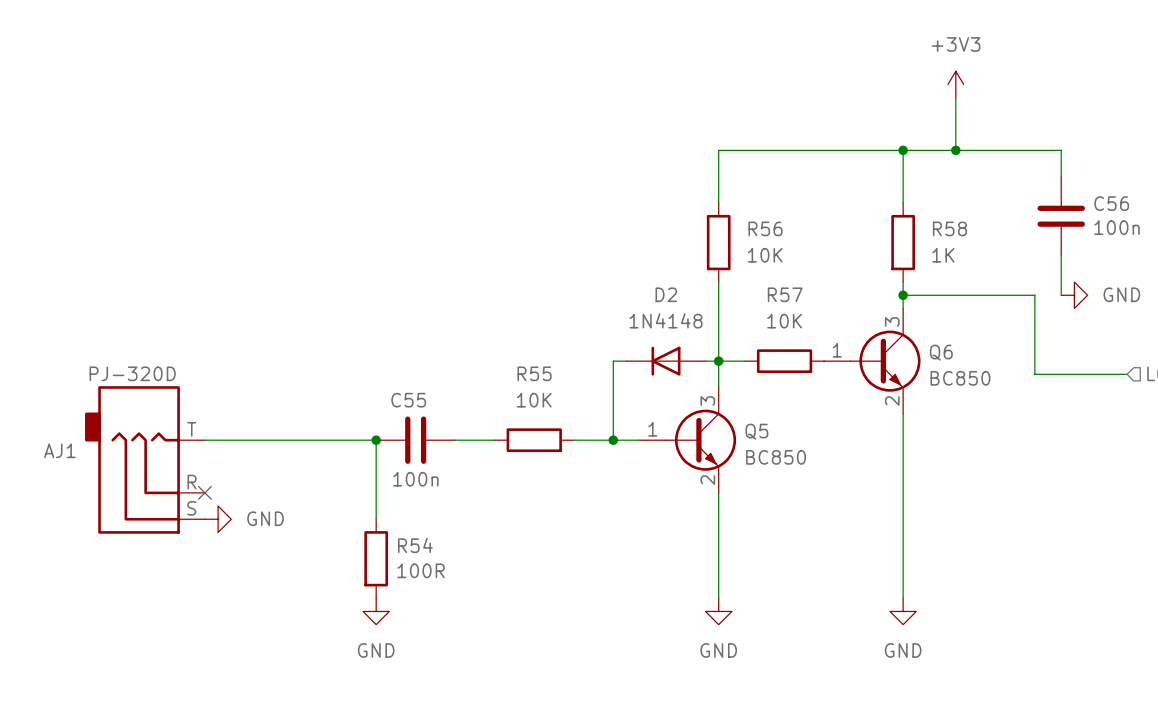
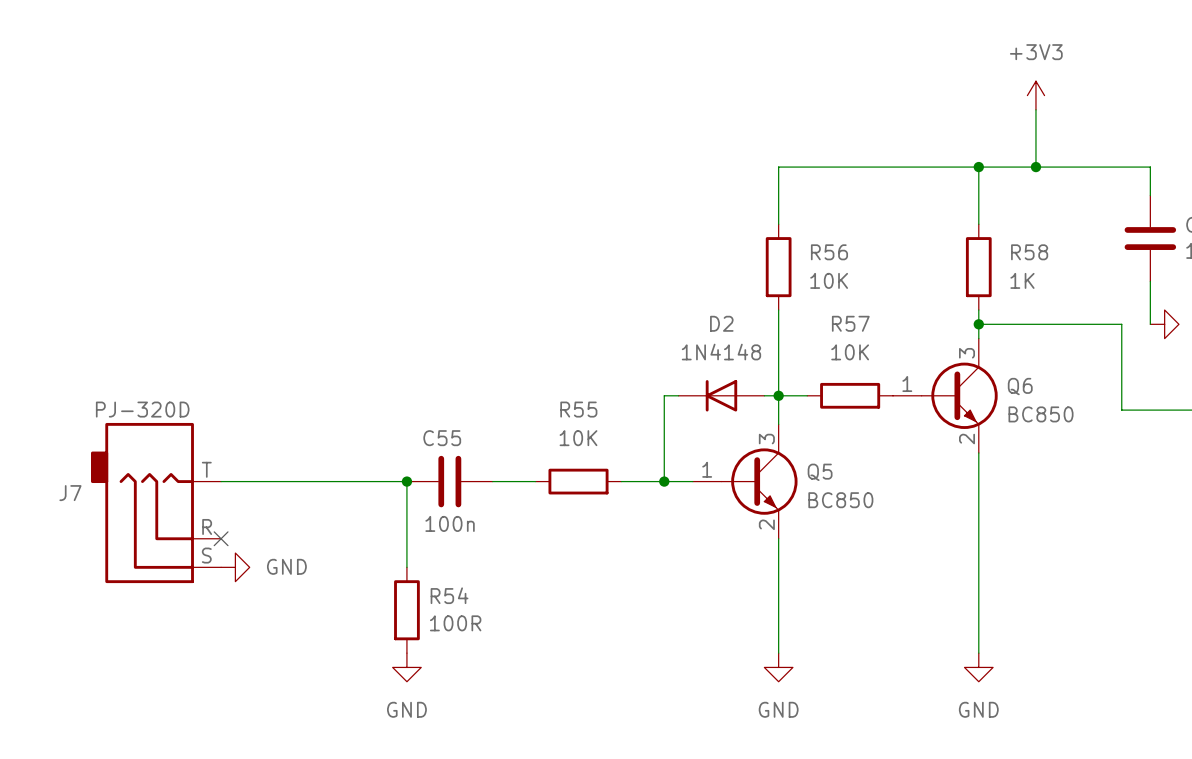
AJ1 name: AJ1 (59, 450) -> J7 (70, 493)

